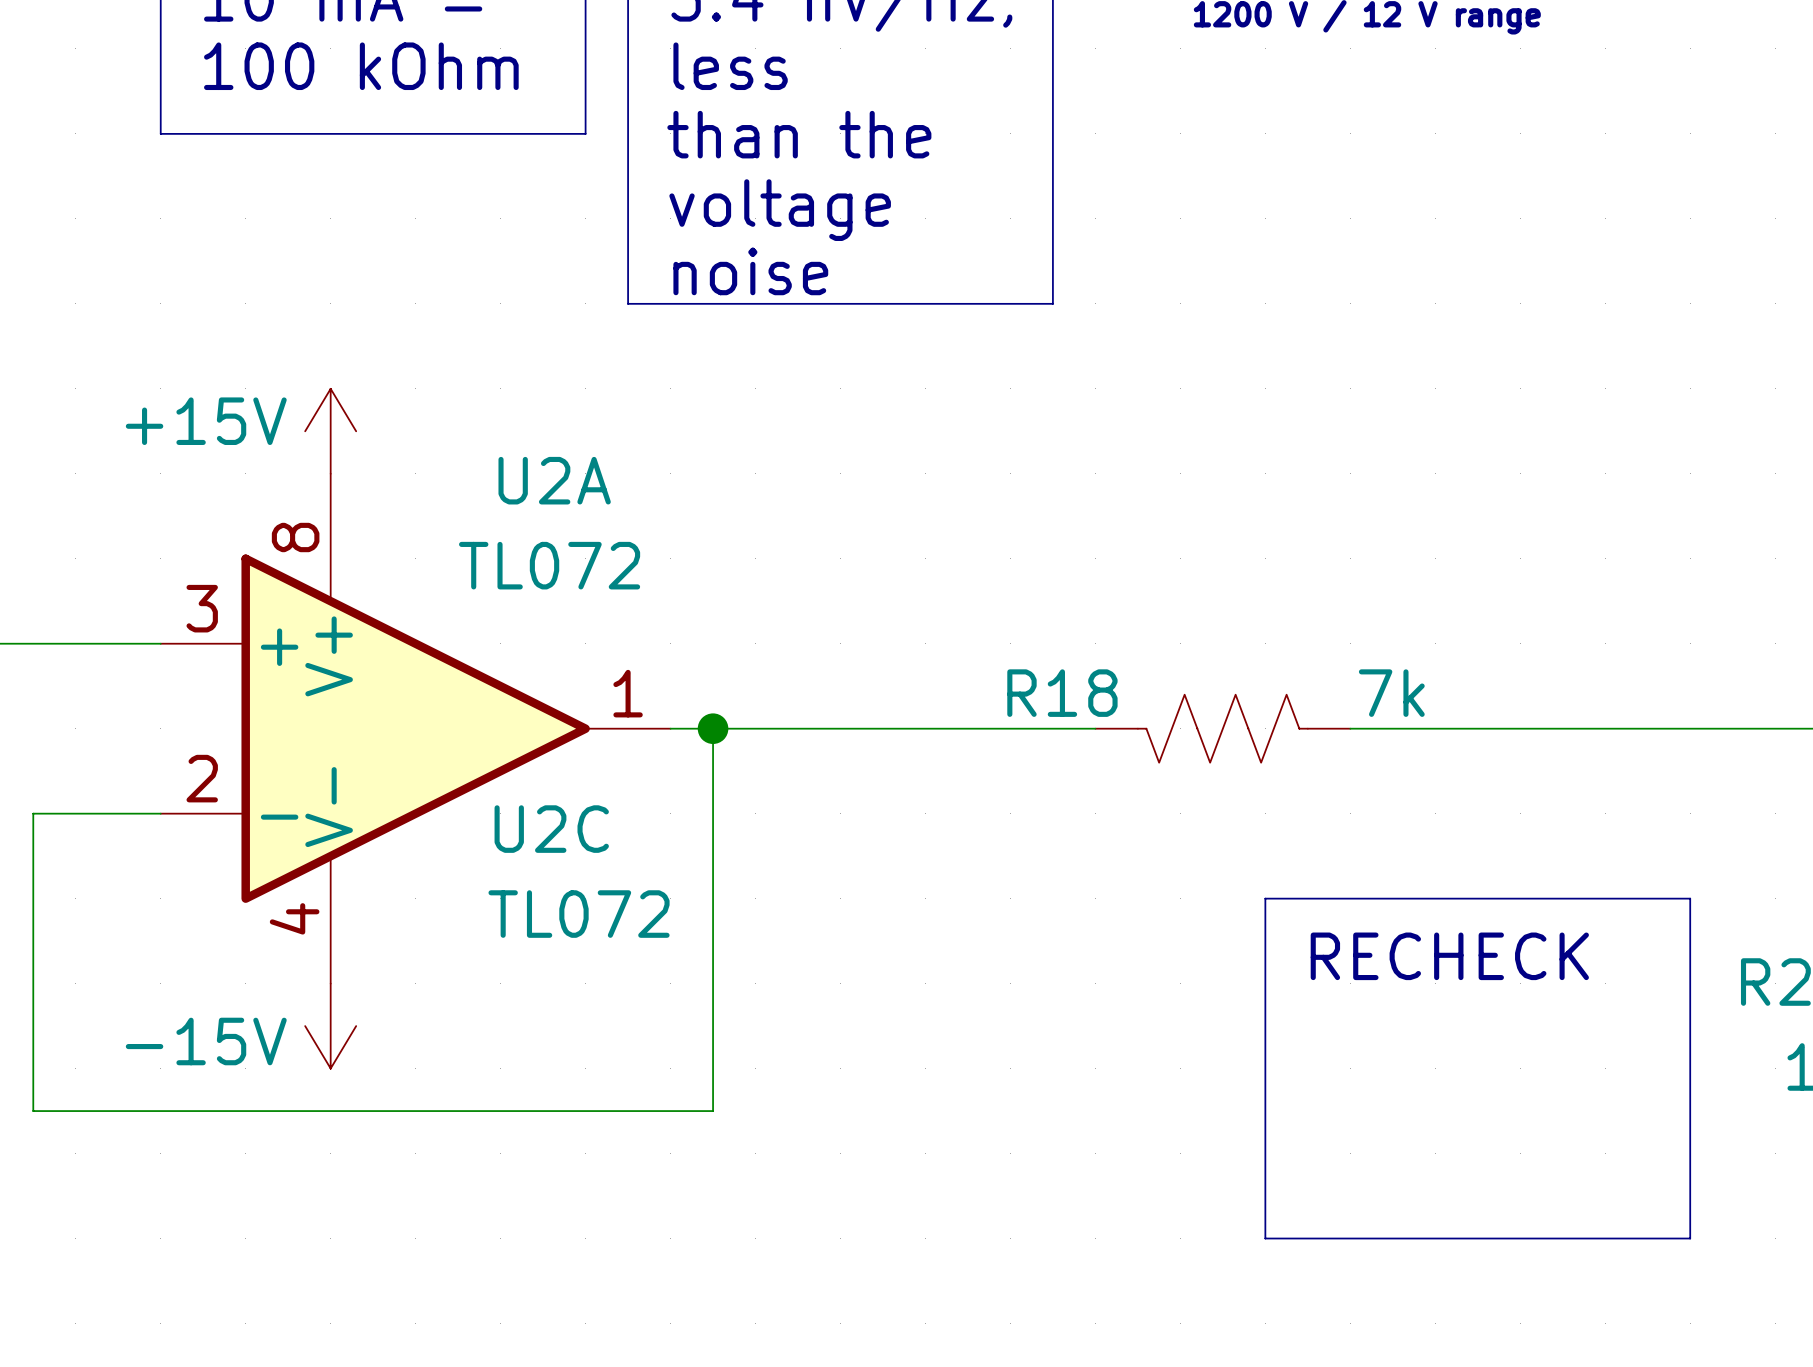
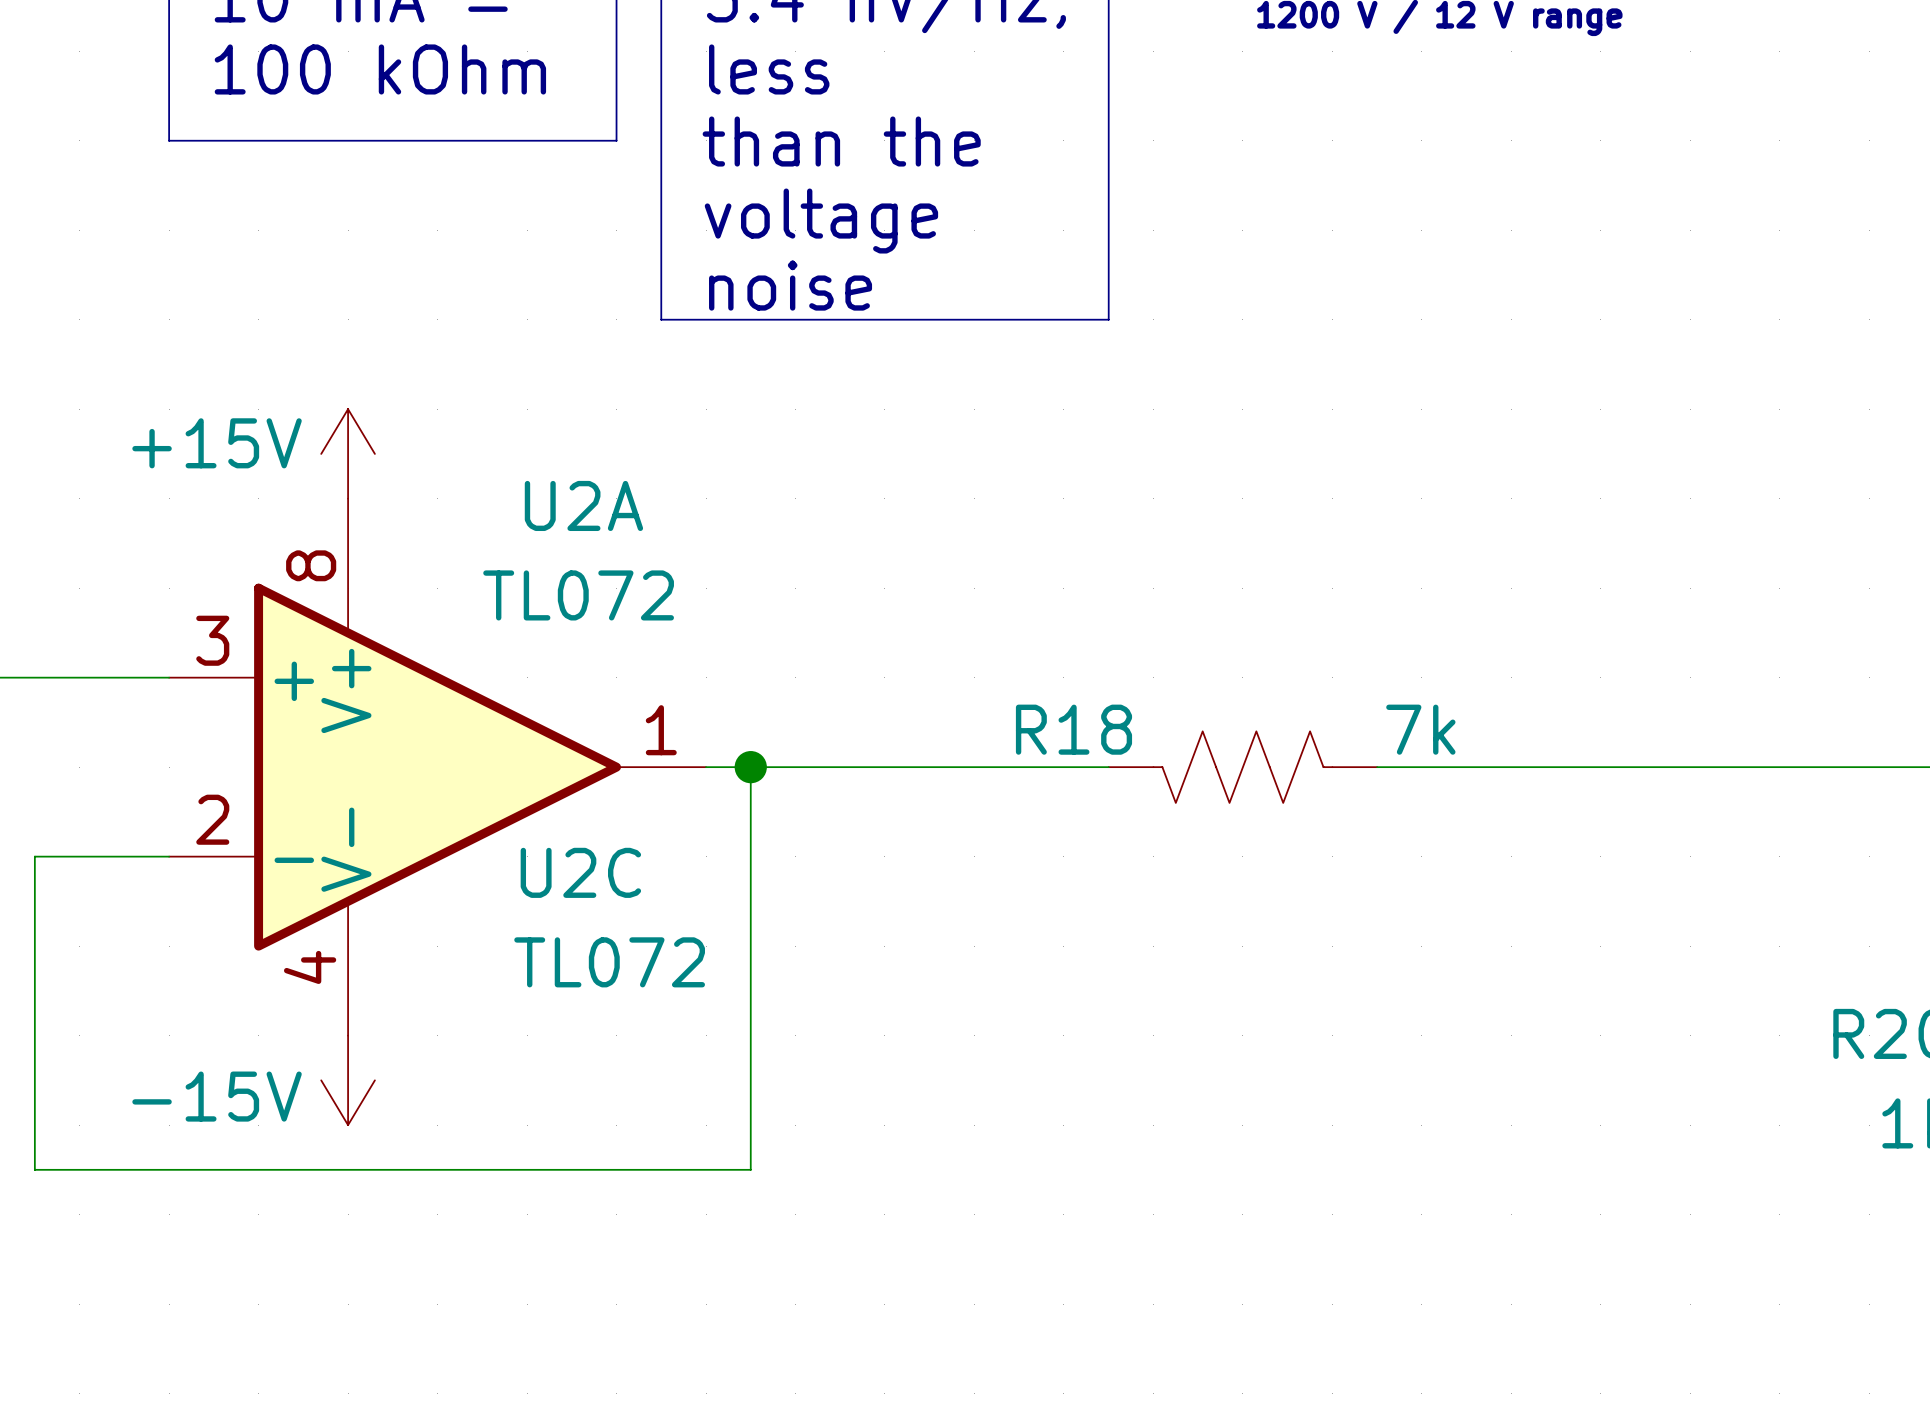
R18 position: (1222, 728) -> (1242, 767)
line: (1265, 898) (1690, 898) (1690, 1238) (1265, 1238) (1265, 898) -> none
text: RECHECK (1449, 956) -> none

